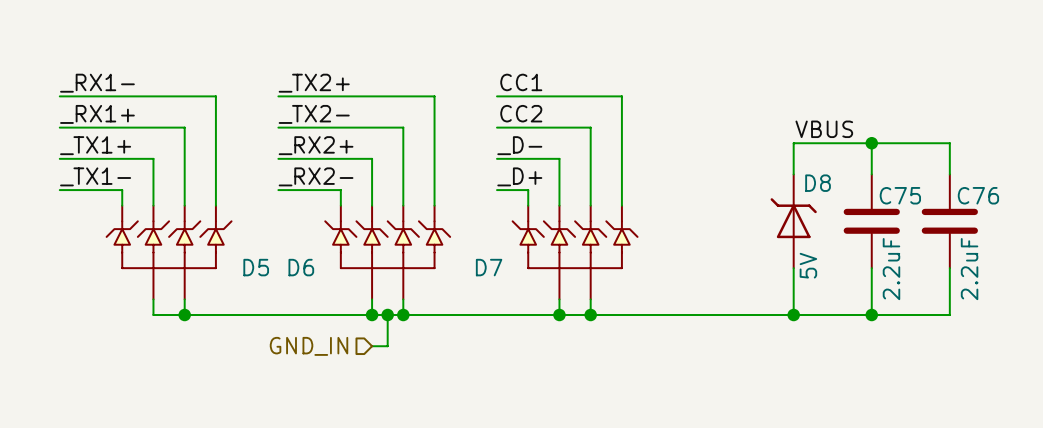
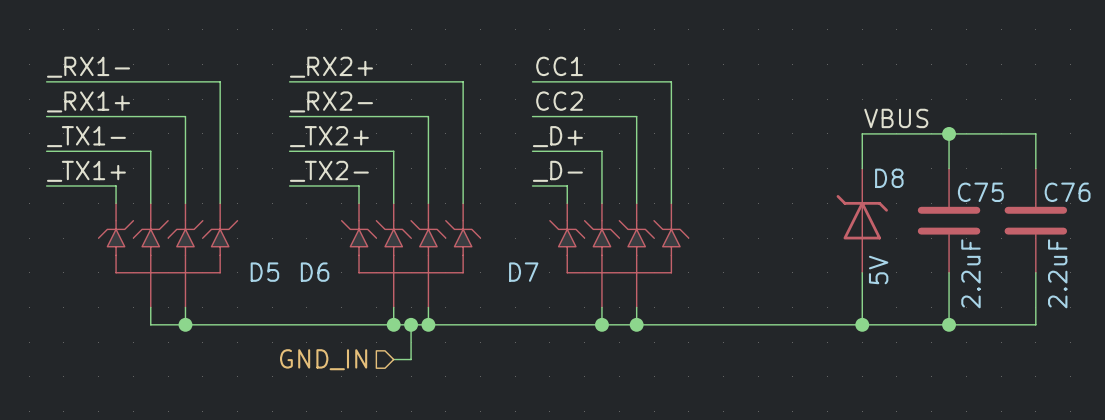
label: _TX2+ (314, 83) -> _RX2+ (331, 67)
label: _TX2- (314, 114) -> _RX2- (331, 101)
label: _TX1+ (95, 145) -> _TX1- (86, 136)
label: _RX2+ (316, 145) -> _TX2+ (329, 136)
label: _D- (519, 145) -> _D+ (557, 136)
label: _TX1- (95, 176) -> _TX1+ (86, 171)
label: _RX2- (316, 176) -> _TX2- (329, 171)
label: _D+ (519, 176) -> _D- (557, 171)

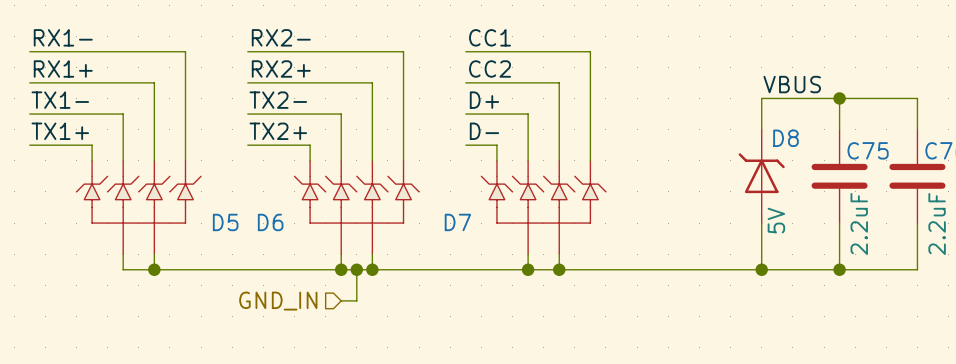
label: _RX1- (88, 67) -> RX1- (63, 37)
label: _RX2+ (331, 67) -> RX2- (281, 37)
label: _RX1+ (88, 101) -> RX1+ (63, 68)
label: _RX2- (331, 101) -> RX2+ (281, 68)
label: _TX1- (86, 136) -> TX1- (60, 100)
label: _TX2+ (329, 136) -> TX2- (278, 100)
label: _D+ (557, 136) -> D+ (484, 100)
label: _TX1+ (86, 171) -> TX1+ (60, 131)
label: _TX2- (329, 171) -> TX2+ (278, 131)
label: _D- (557, 171) -> D- (484, 131)

